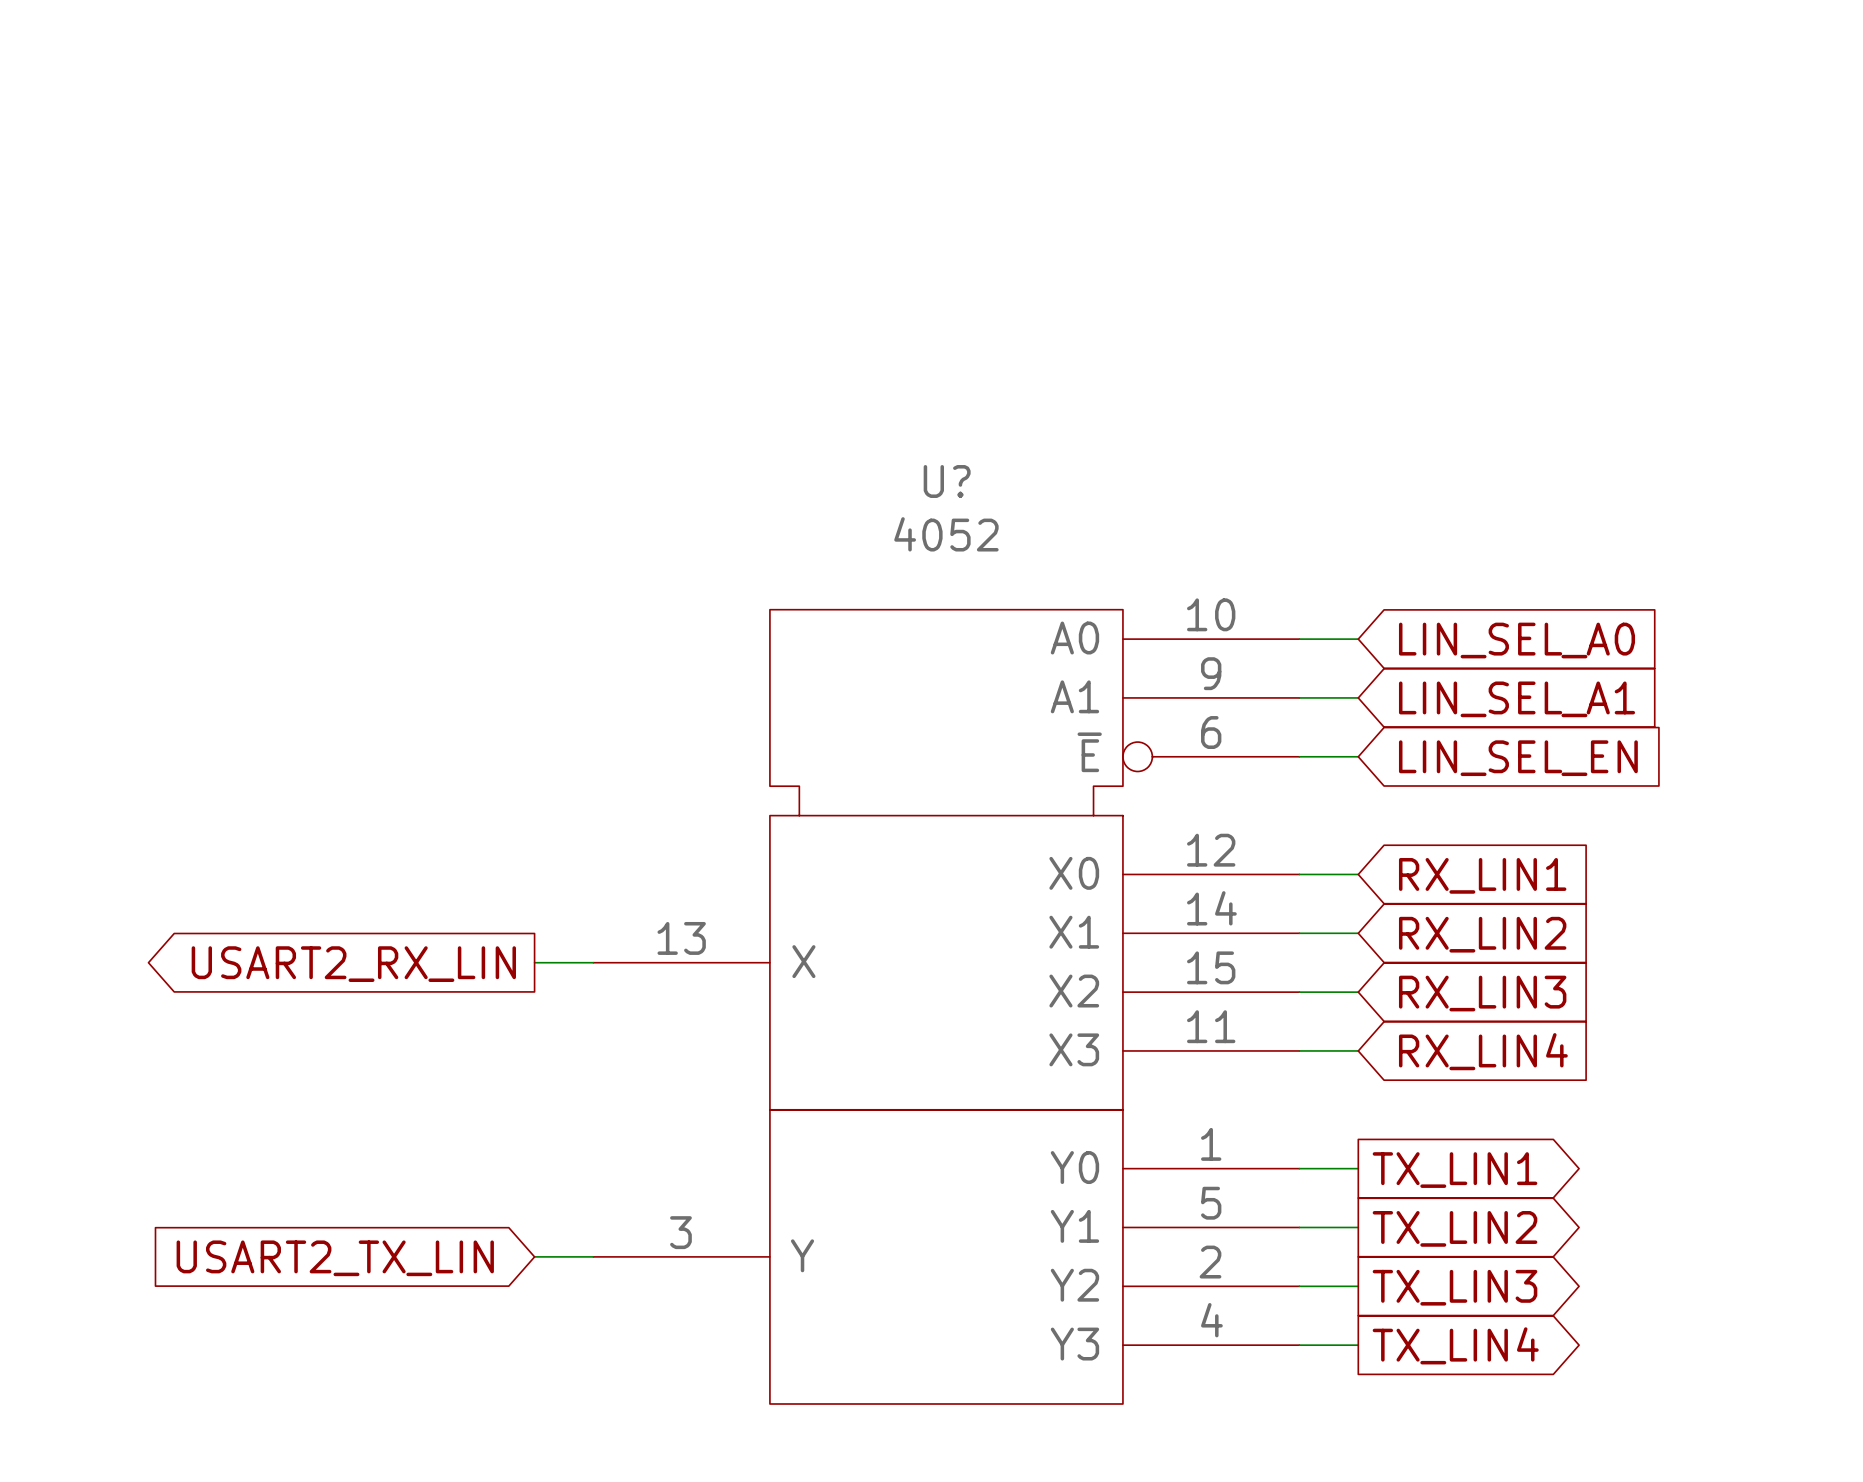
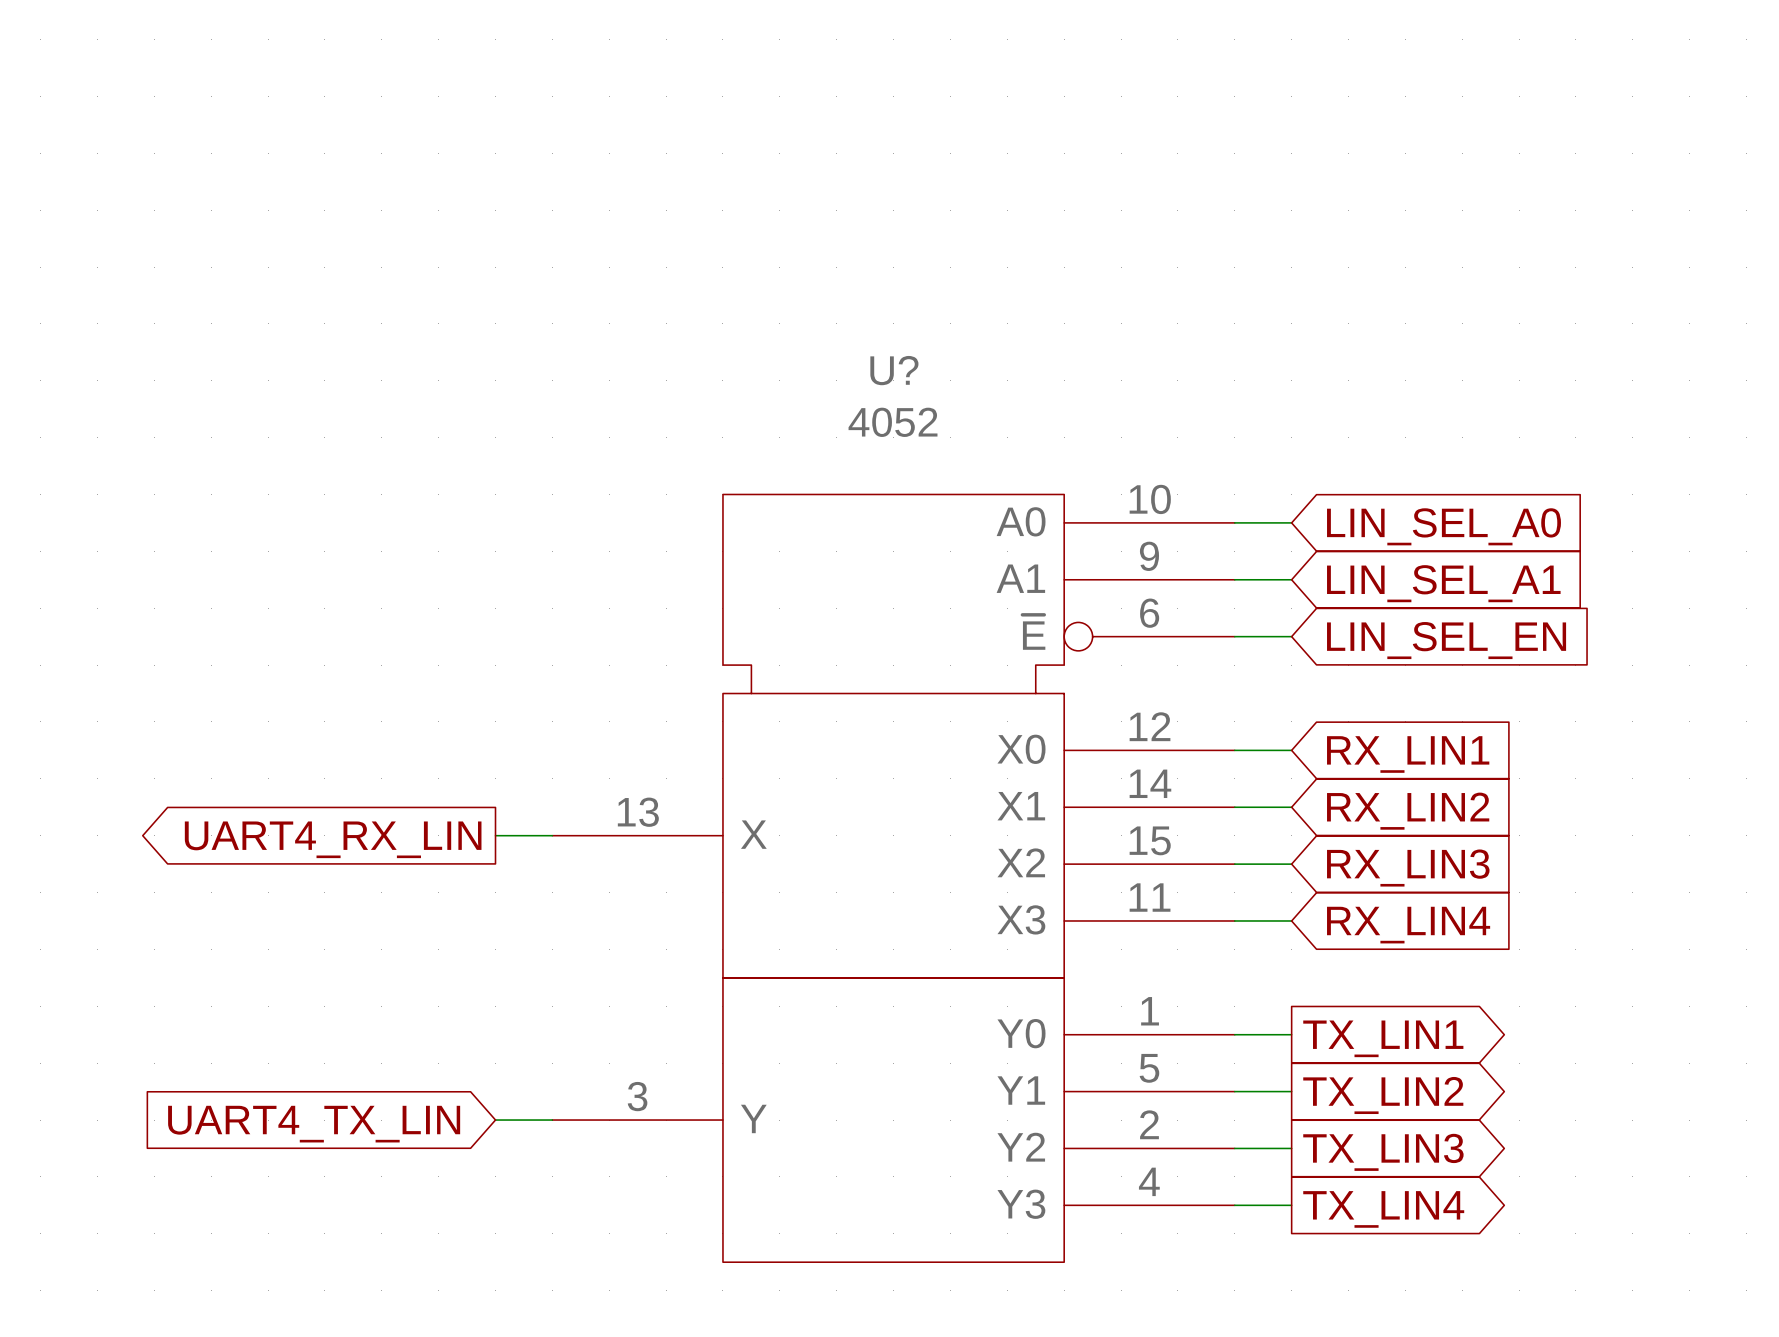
global label: USART2_RX_LIN (353, 964) -> UART4_RX_LIN (333, 839)
global label: USART2_TX_LIN (335, 1258) -> UART4_TX_LIN (314, 1124)

